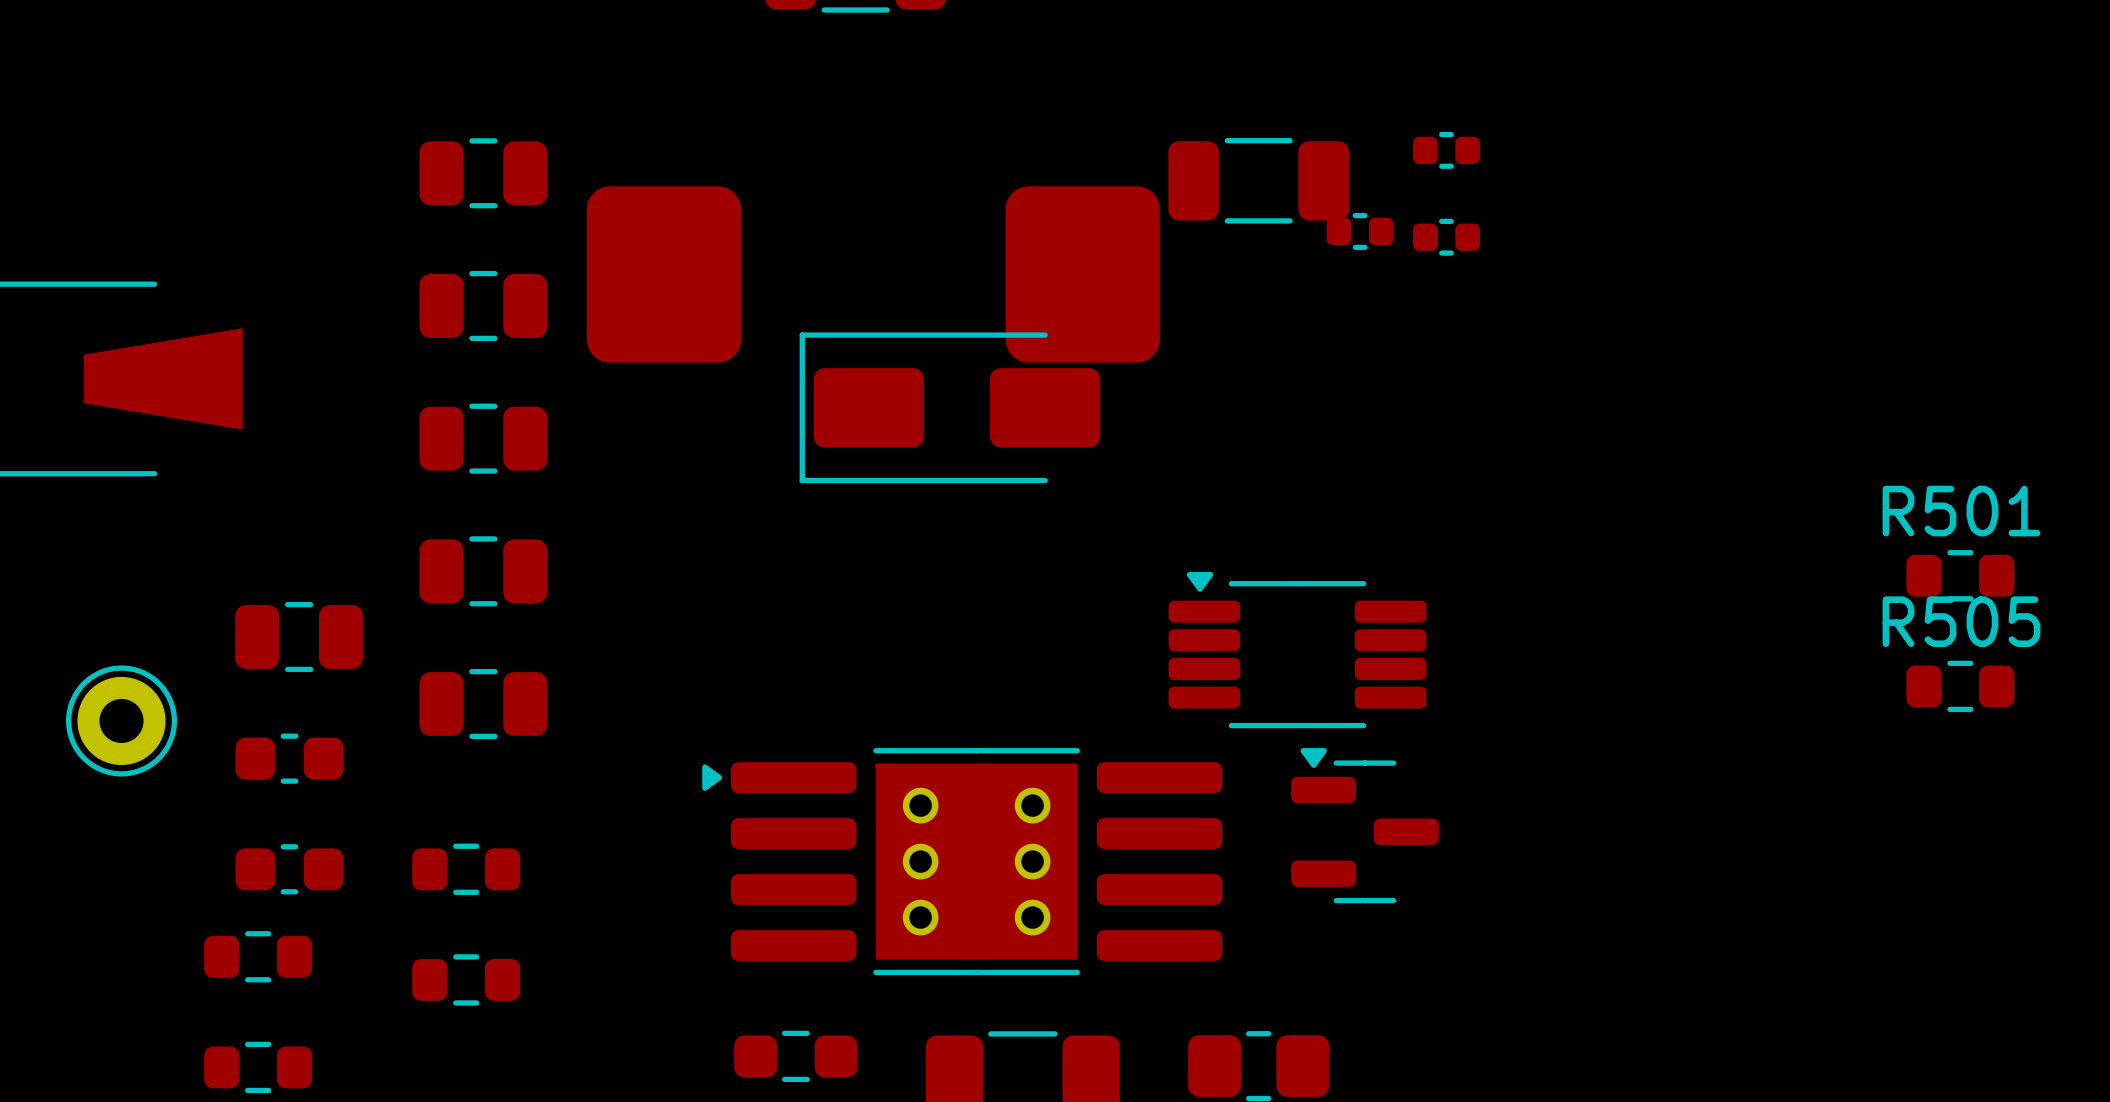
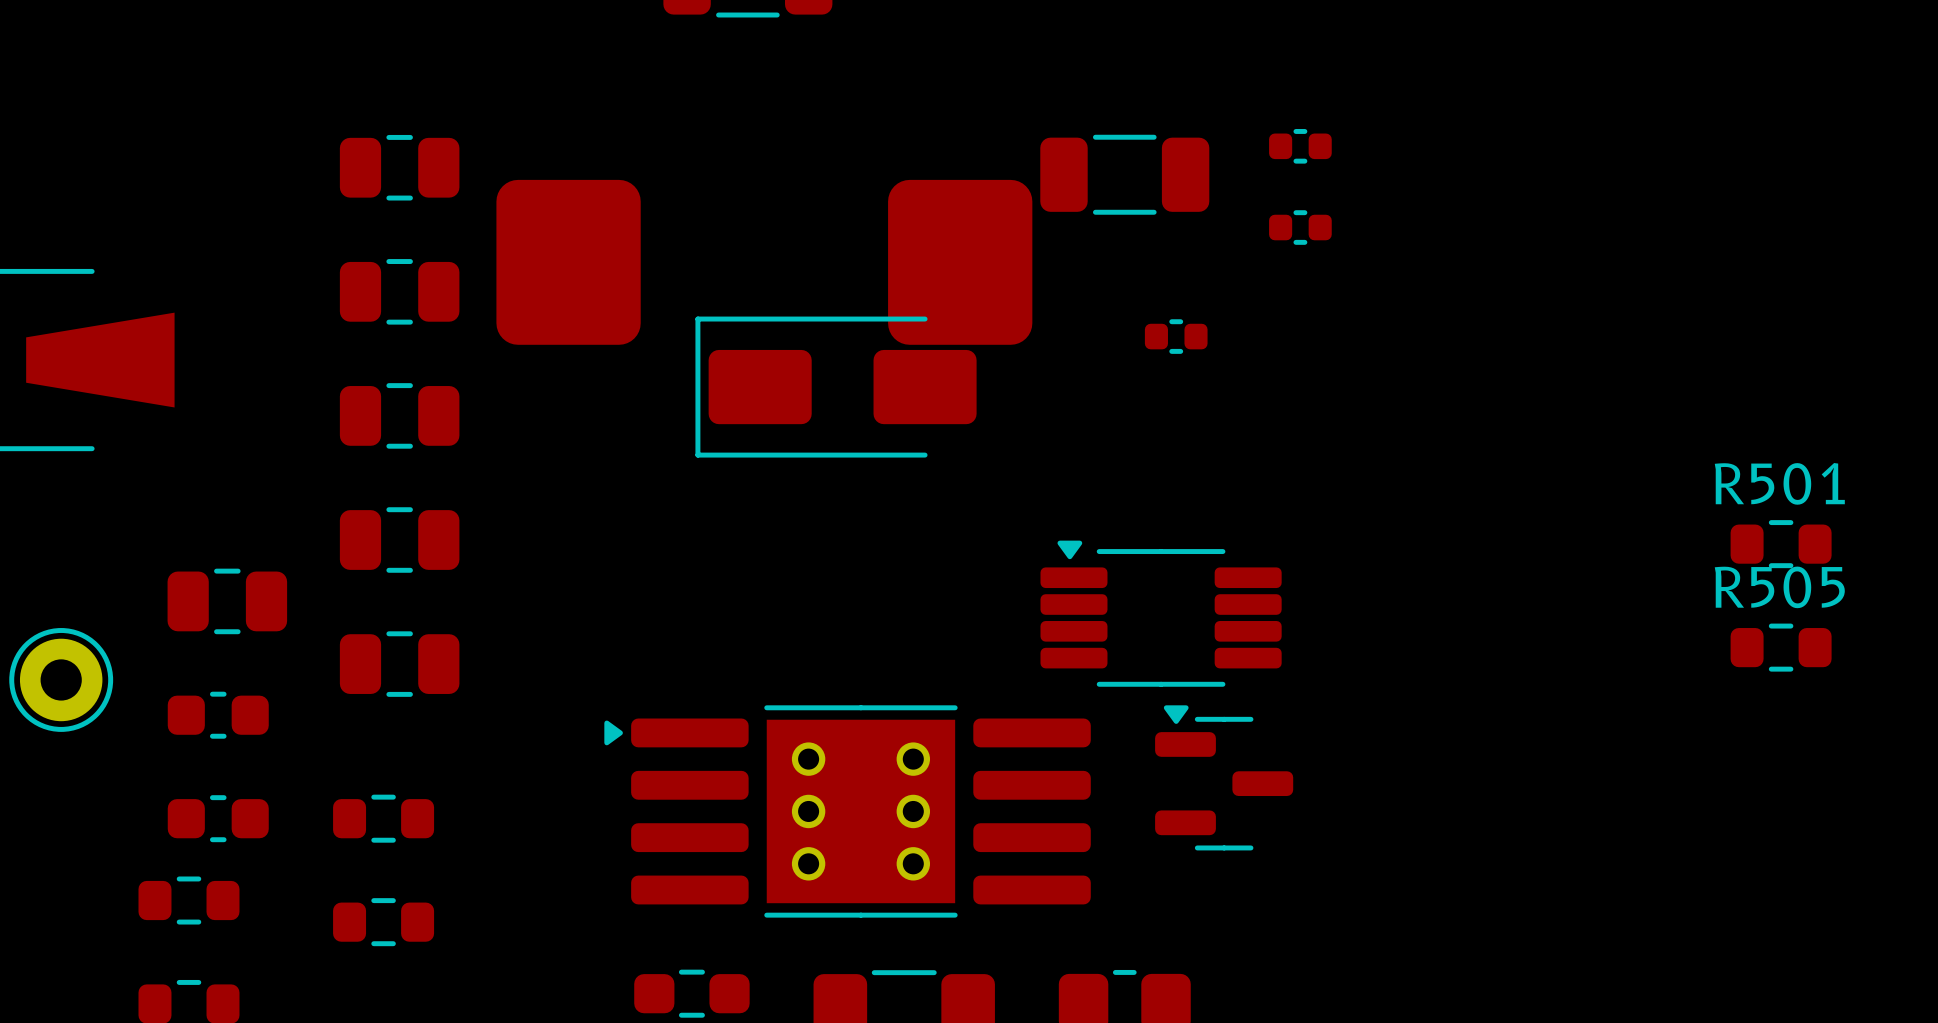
part position: (1360, 231) -> (1176, 336)

